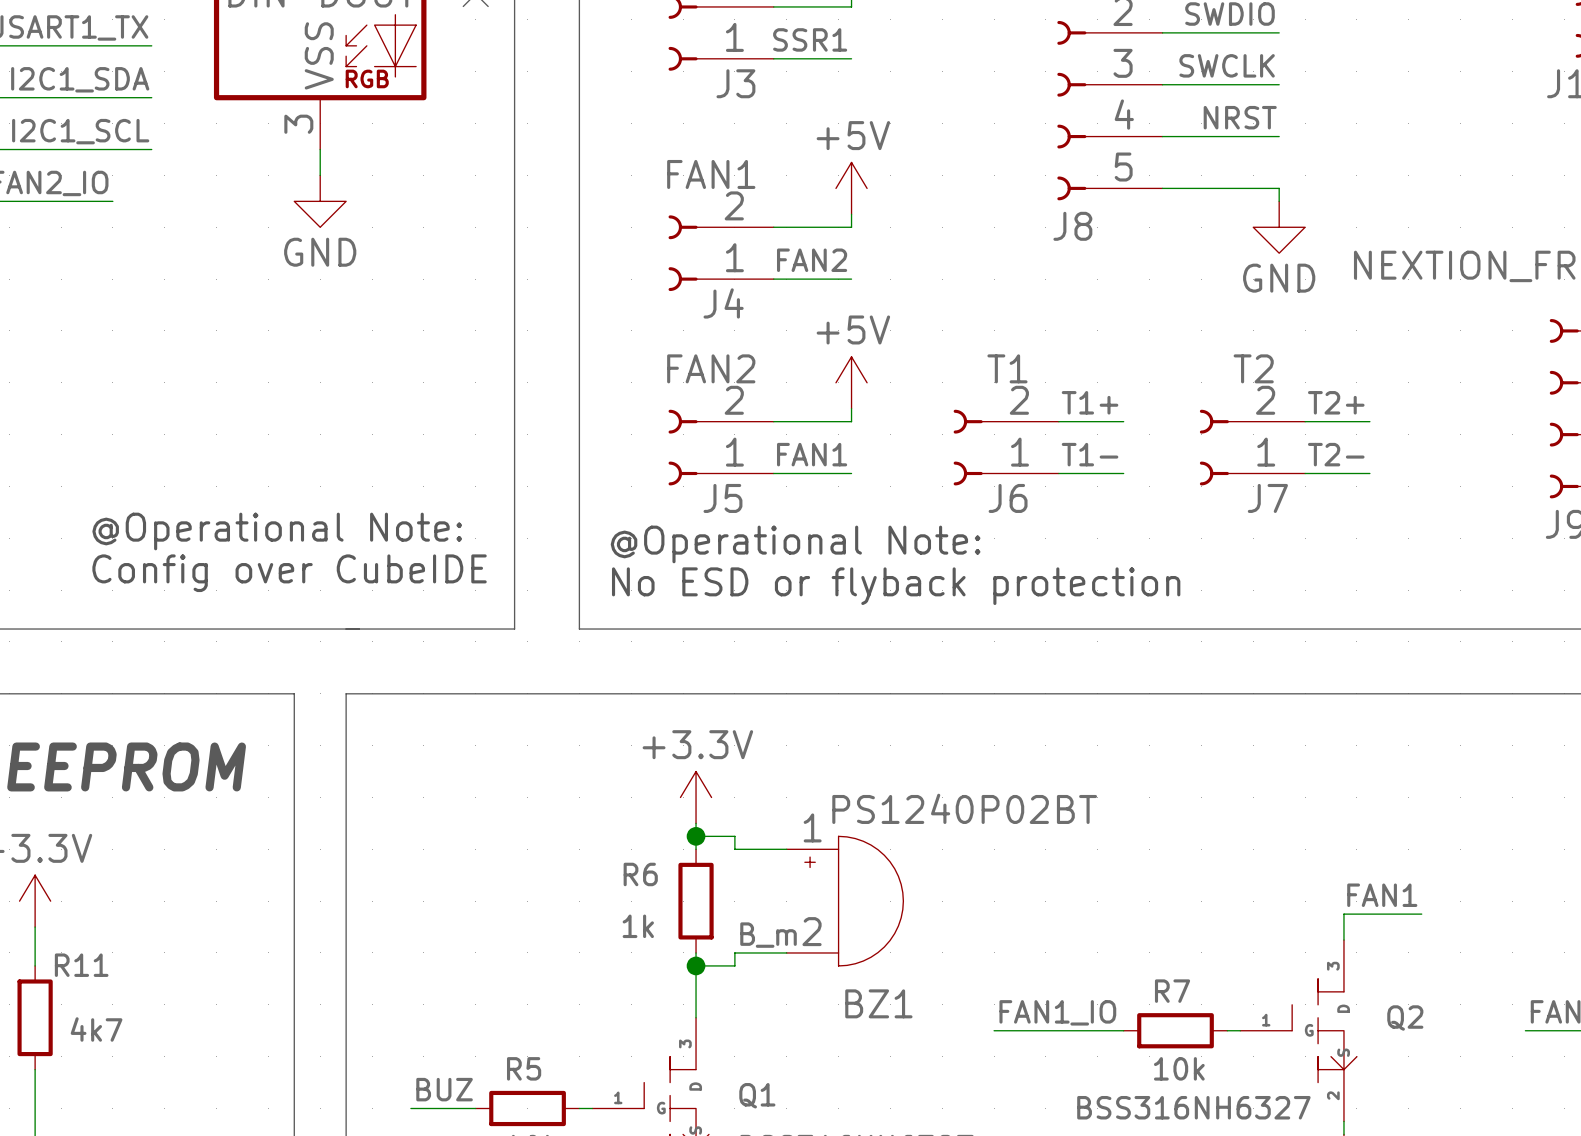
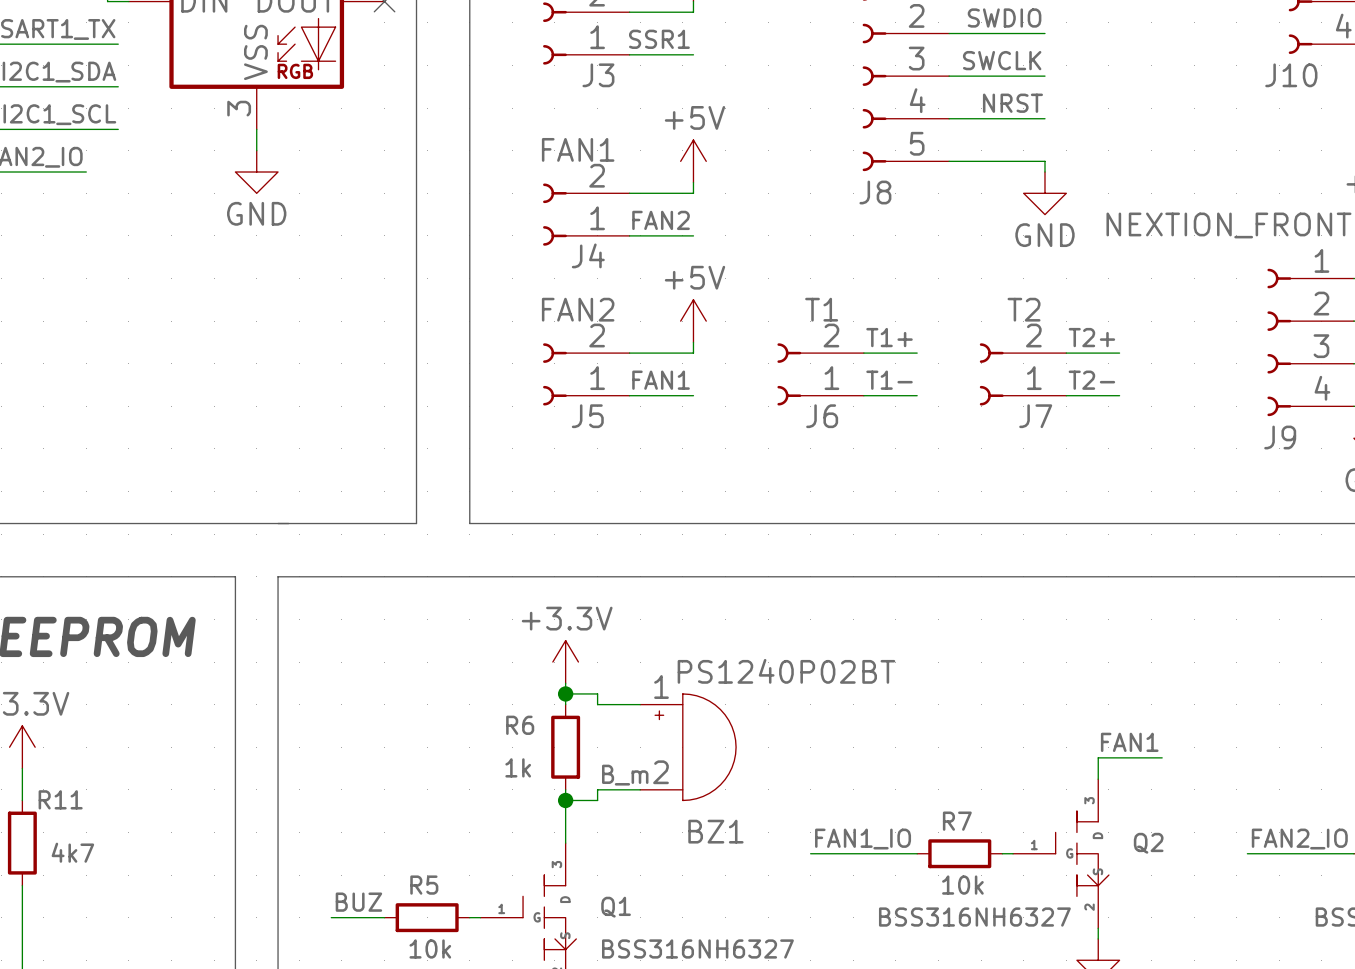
text: @Operational Note: (277, 531) -> none
text: @Operational Note: (795, 544) -> none
text: Config over CubeIDE (289, 573) -> none
text: No ESD or flyback protection (896, 586) -> none

